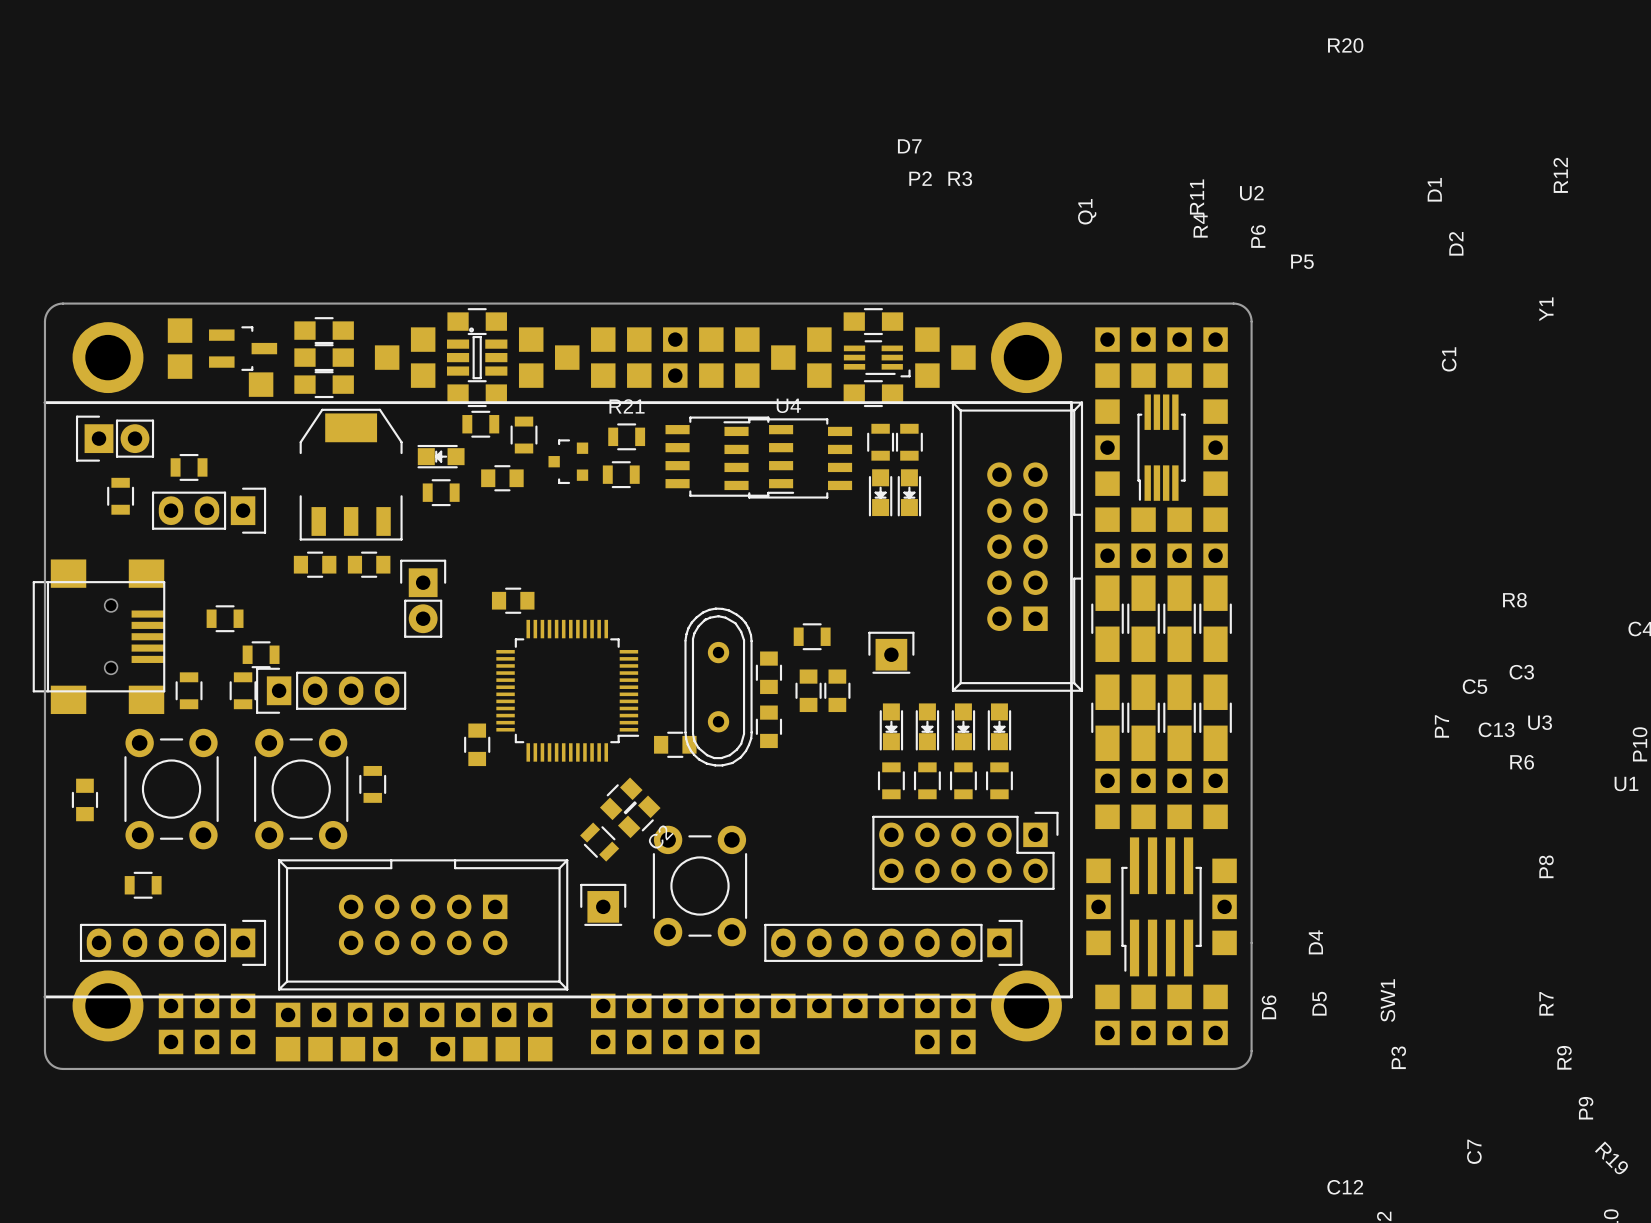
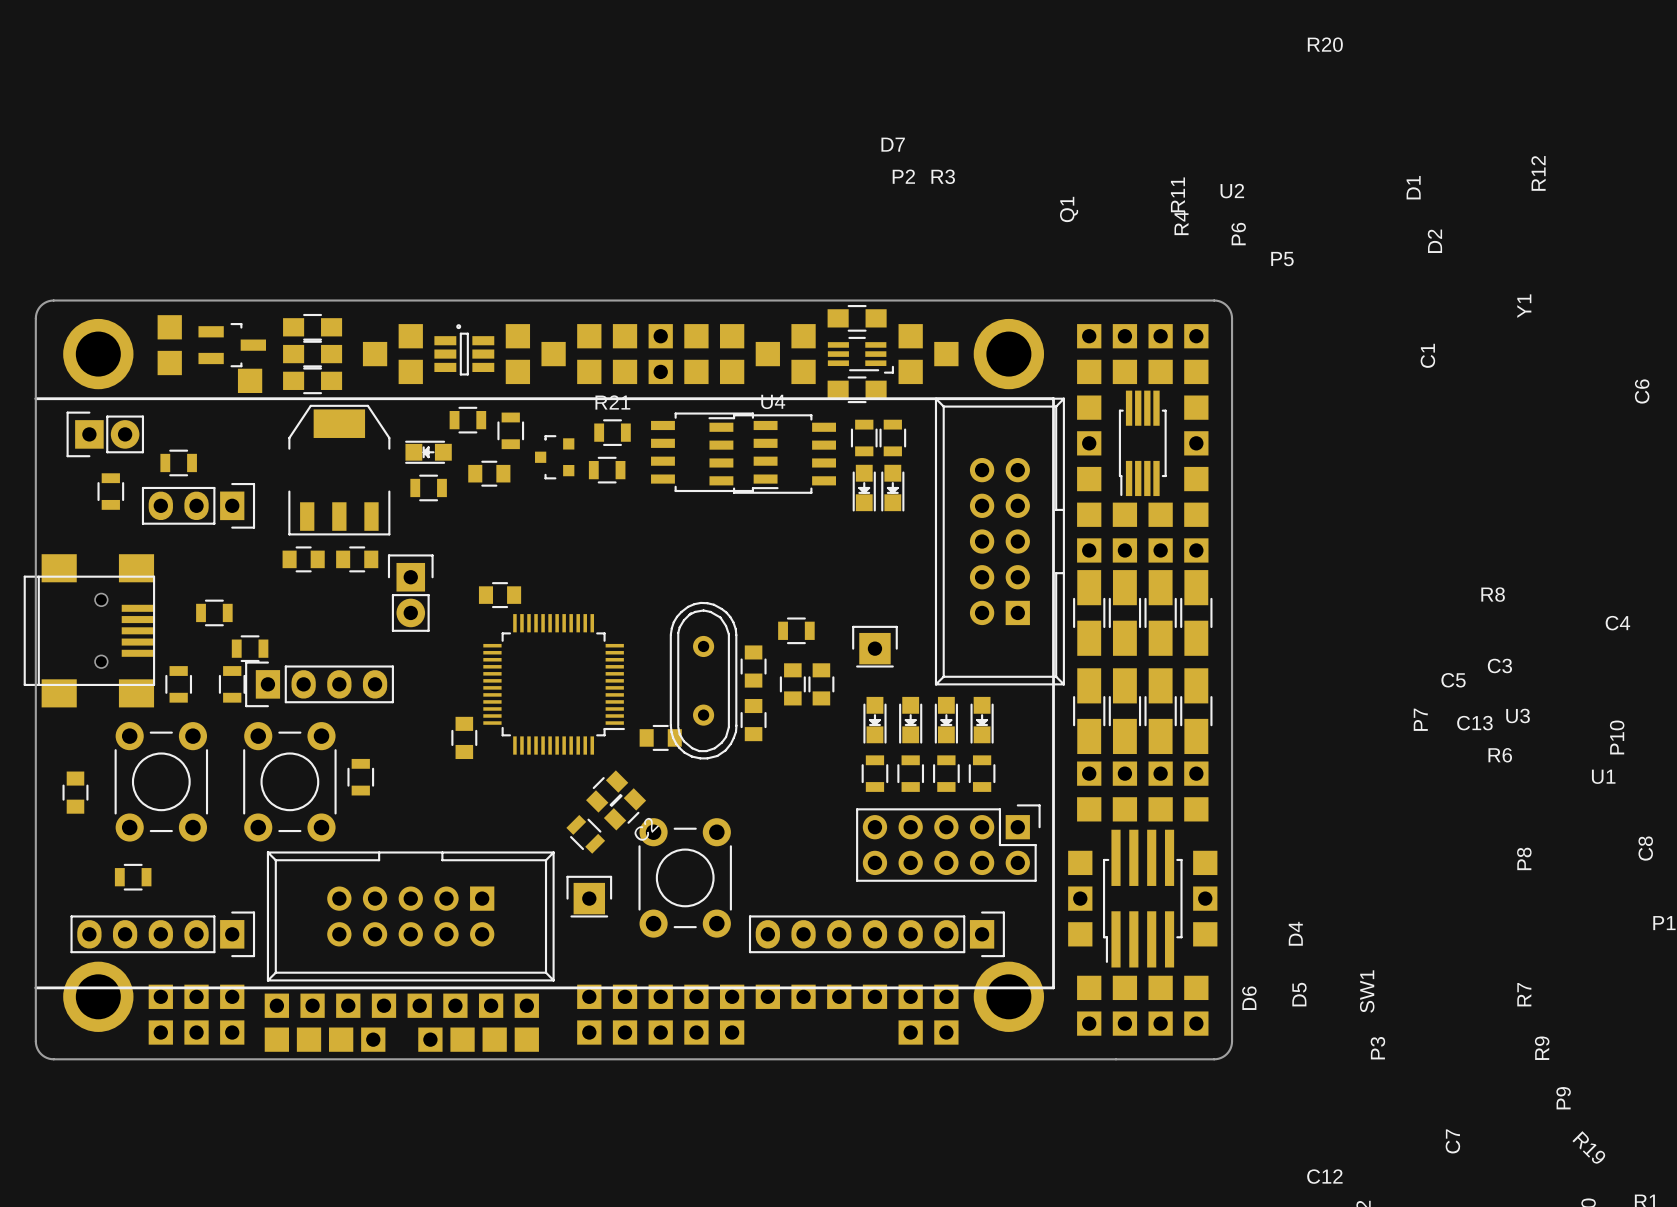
part: (477, 321) -> none
part: (477, 393) -> none

